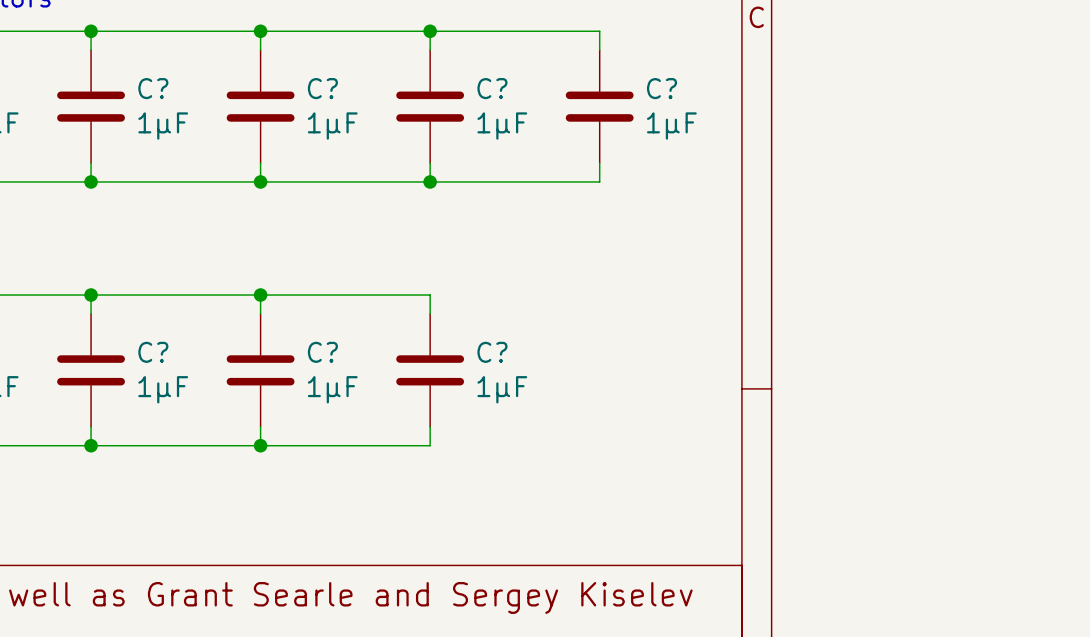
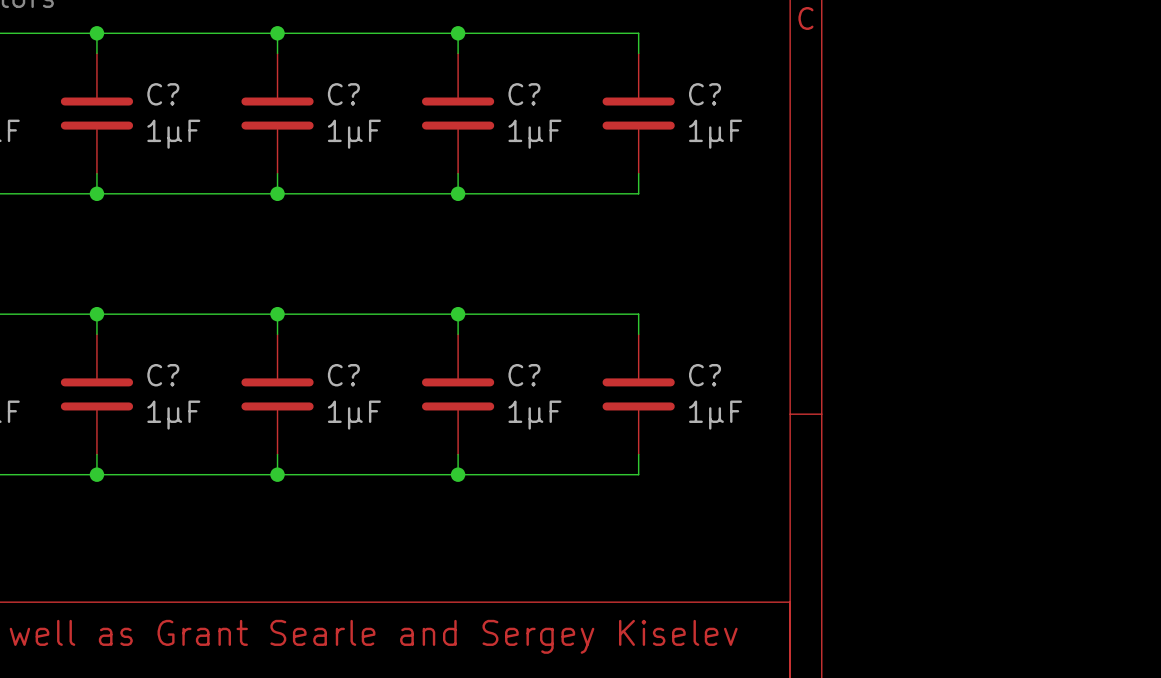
wire: none -> (458, 314) (638, 314) (638, 334)
junction: none -> (458, 314)
C?: none -> 1µF (638, 394)
wire: none -> (638, 454) (638, 474) (458, 474)
junction: none -> (458, 474)

